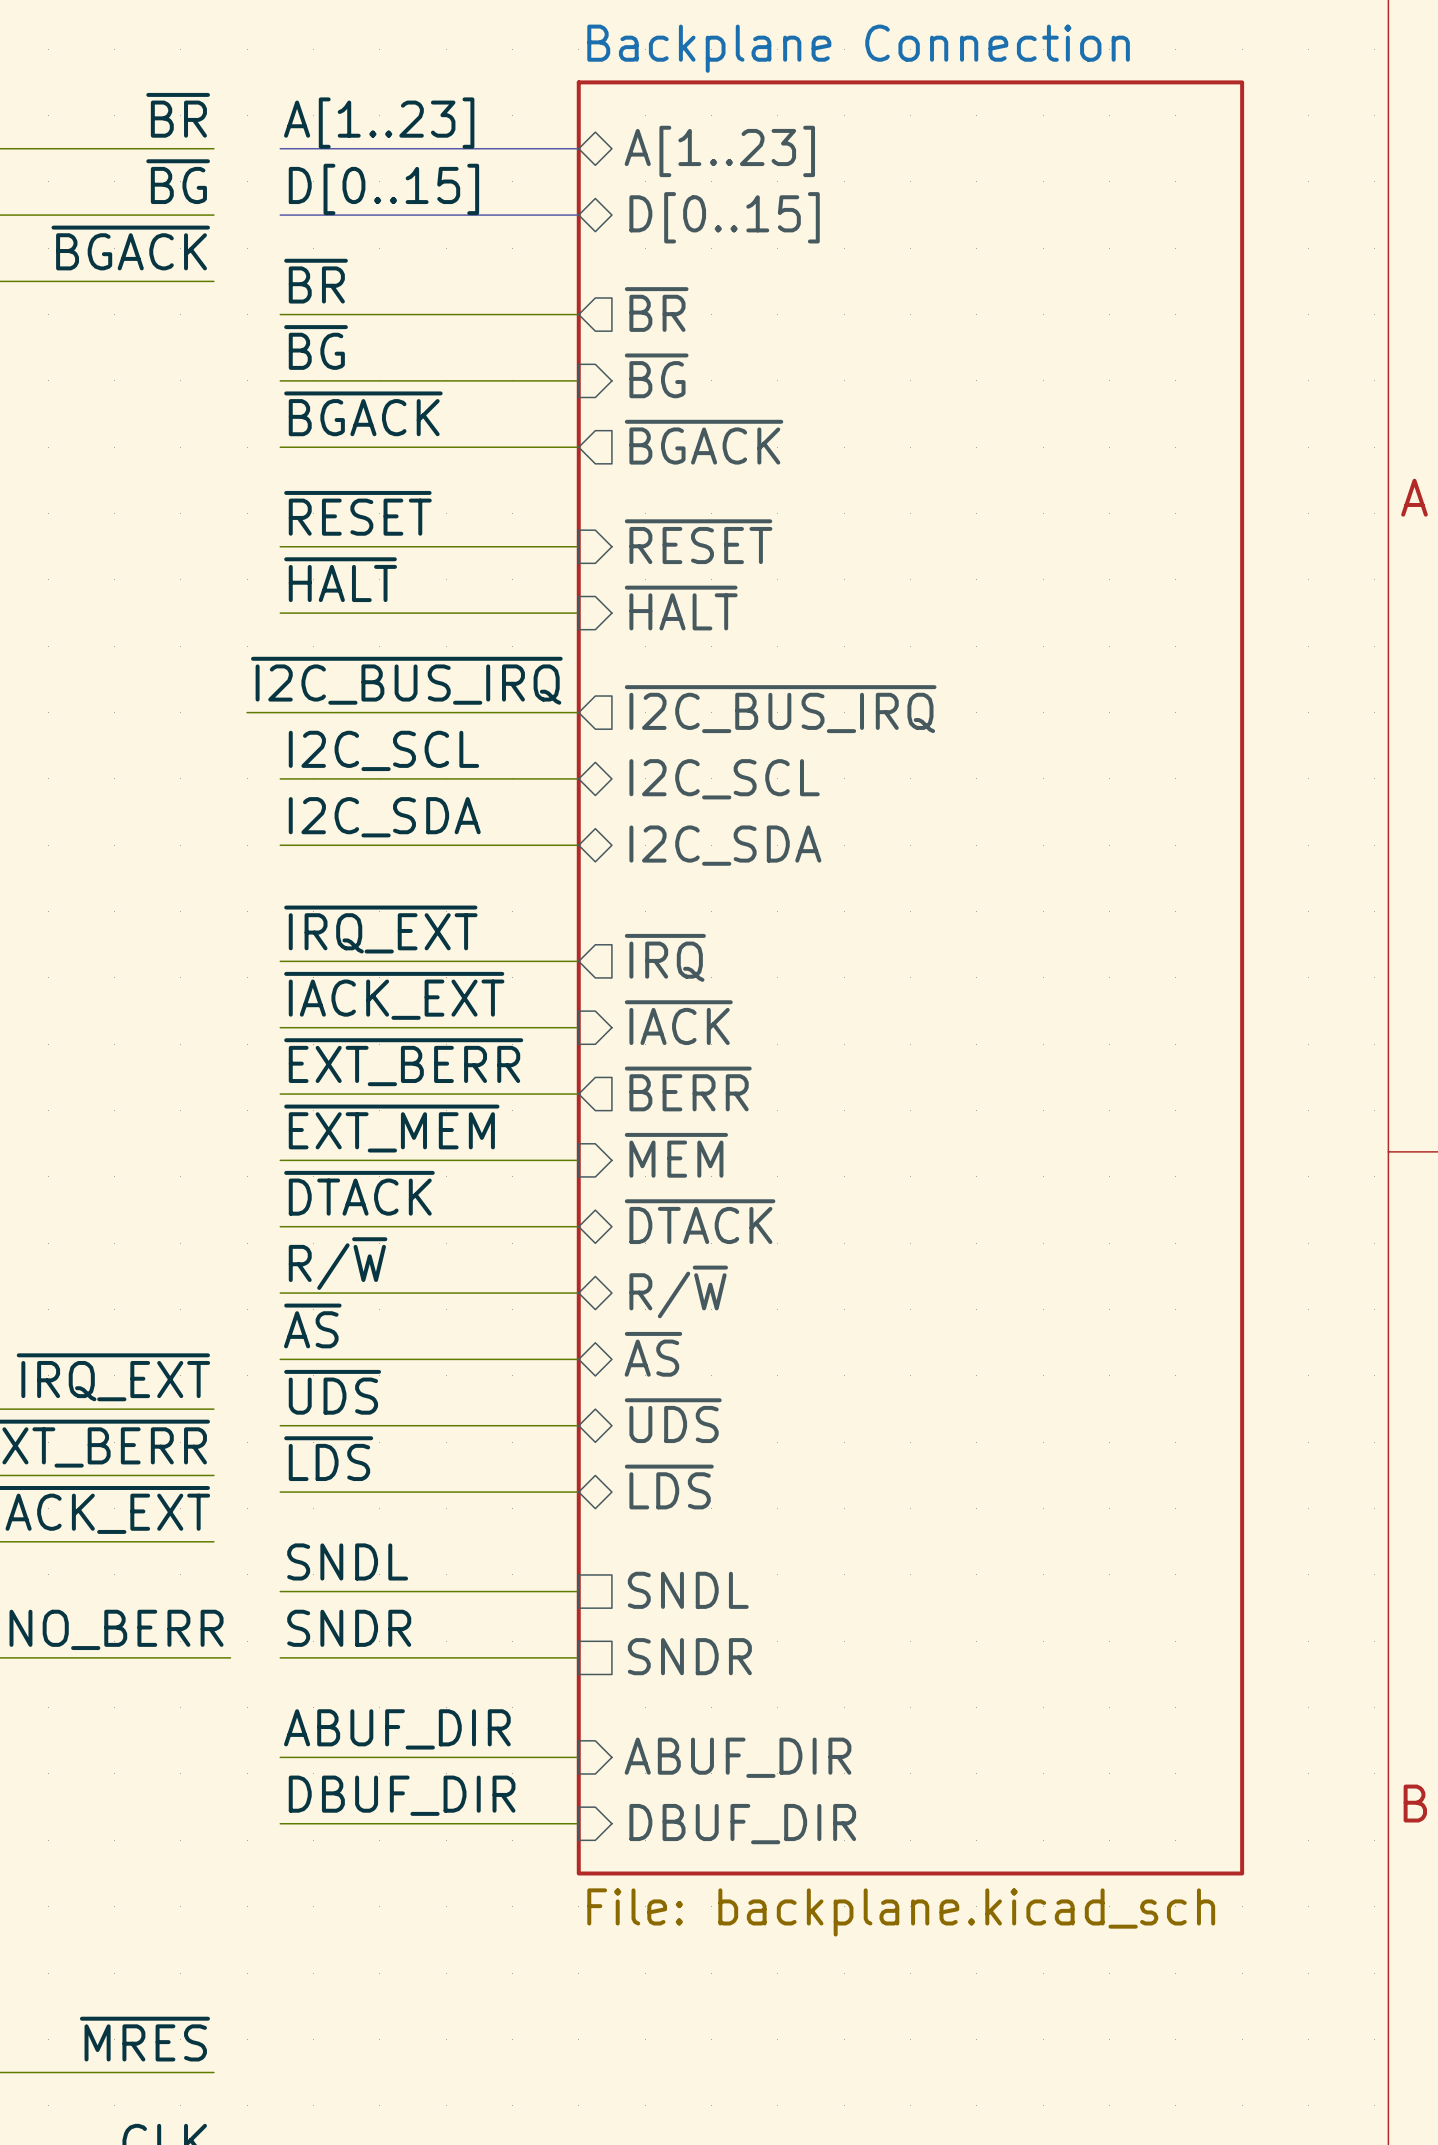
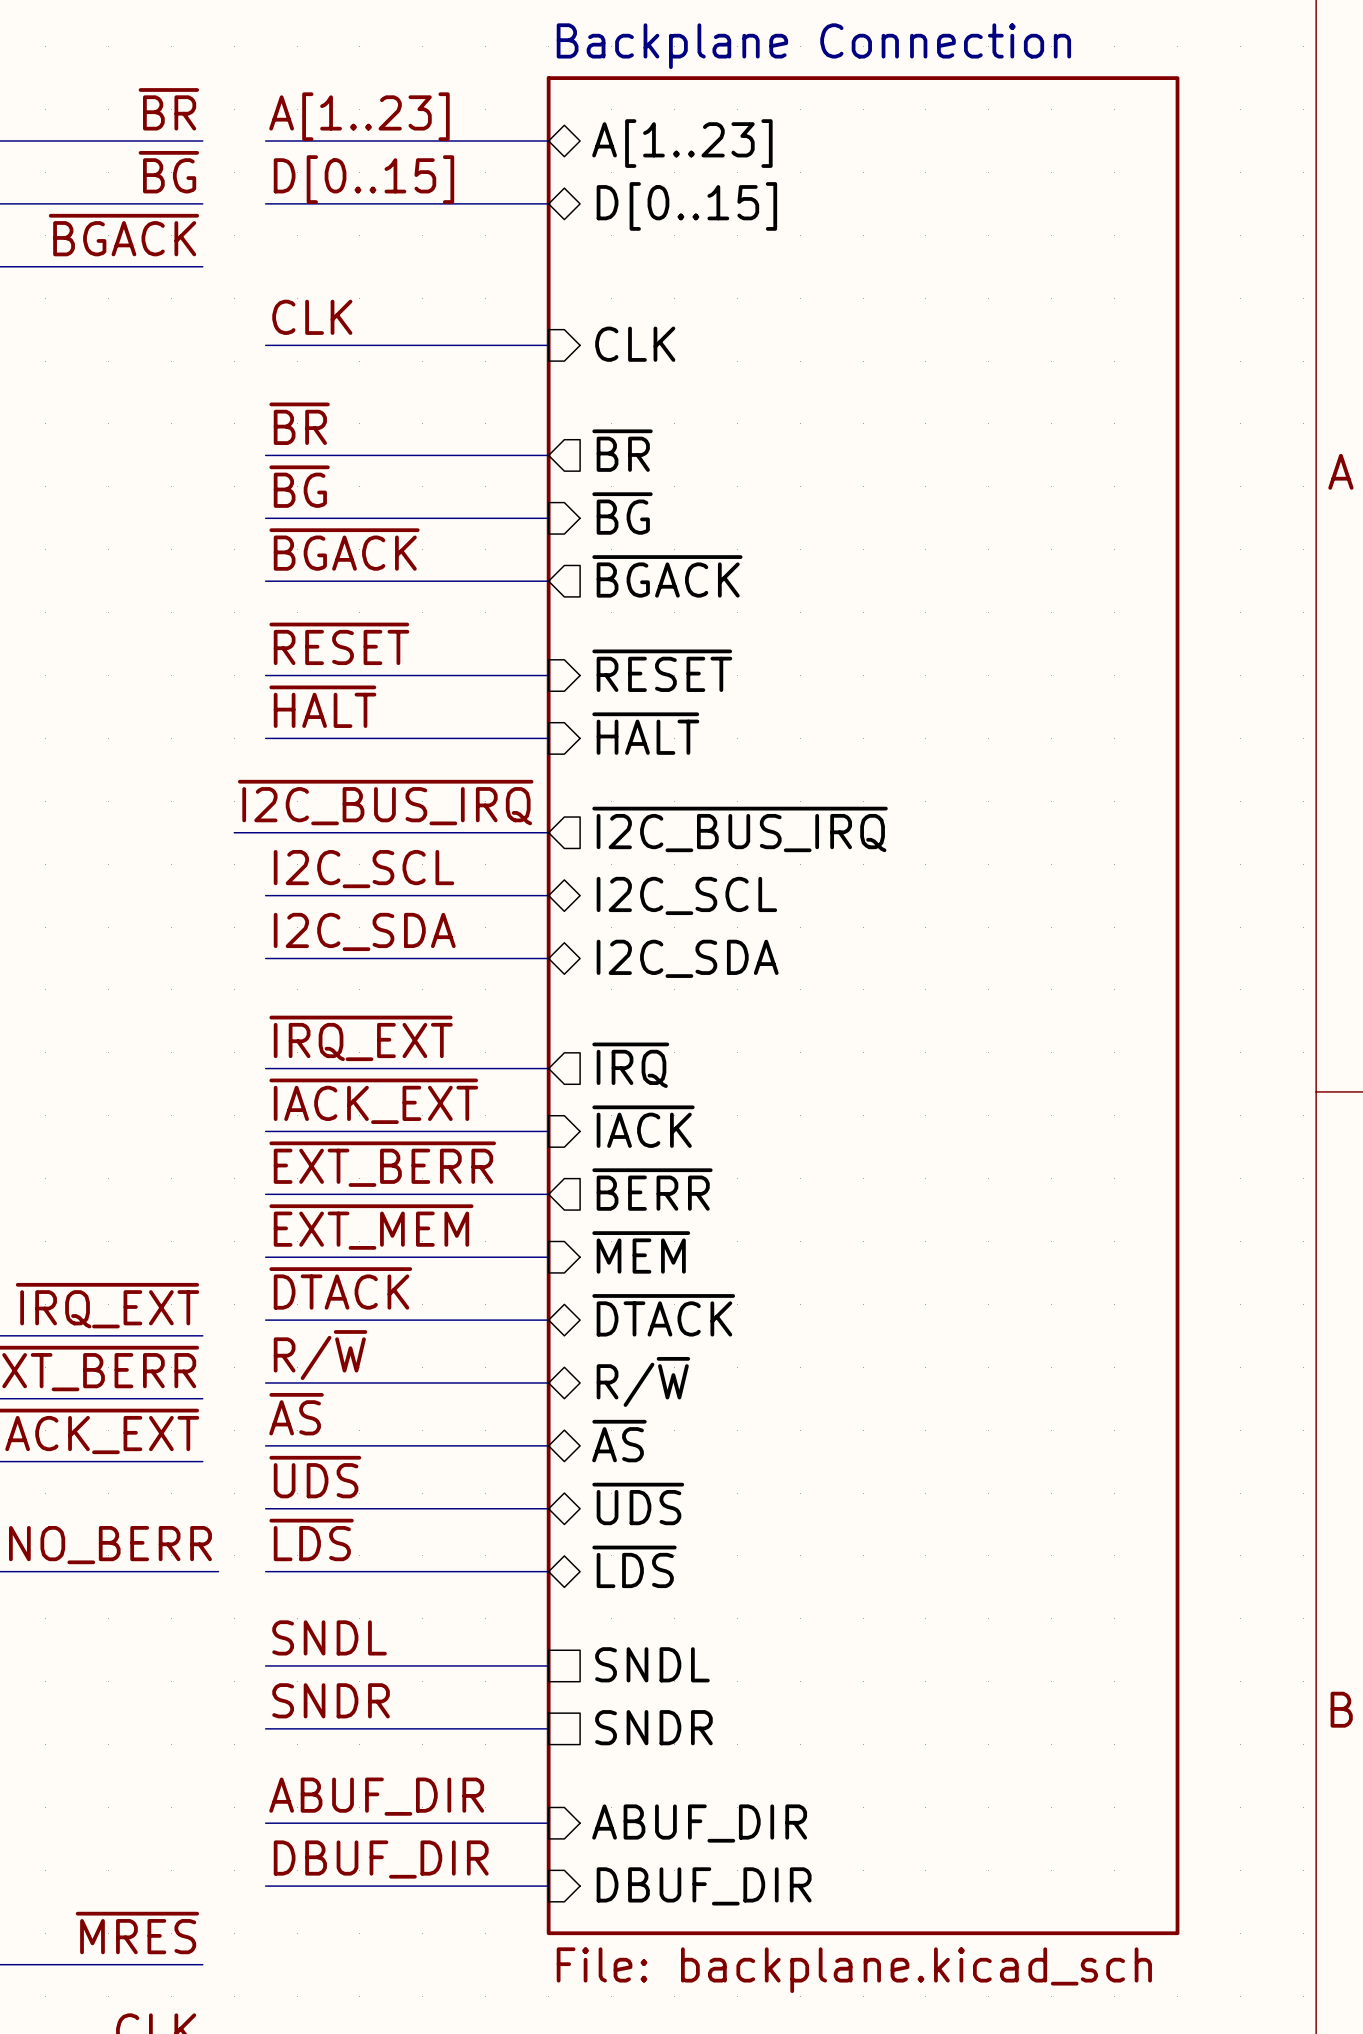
label position: ~{BR} (316, 281) -> ~{BR} (299, 423)
sheet pin position: ~{BR} (656, 309) -> ~{BR} (622, 450)
wire: (280, 314) (578, 314) -> (265, 345) (548, 345)
label: ~{BG} (316, 347) -> CLK (312, 317)
sheet pin: ~{BG} (656, 375) -> CLK (635, 344)
wire: (280, 380) (578, 380) -> (265, 455) (548, 455)
label: ~{BGACK} (363, 413) -> none
sheet pin: ~{BGACK} (704, 442) -> none
wire: (280, 447) (578, 447) -> (265, 958) (548, 958)
label: ~{RESET} (357, 513) -> ~{BG} (299, 486)
sheet pin: ~{RESET} (698, 541) -> ~{BG} (622, 513)
label: ~{HALT} (340, 579) -> ~{BGACK} (344, 549)
sheet pin shape: input (681, 608) -> output (667, 576)
sheet pin: ~{HALT} (681, 608) -> ~{BGACK} (667, 576)
label: none -> ~{RESET} (339, 643)
label position: ~{I2C_BUS_IRQ} (406, 680) -> ~{I2C_BUS_IRQ} (385, 802)
sheet pin shape: output (780, 709) -> input (662, 670)
sheet pin: ~{I2C_BUS_IRQ} (780, 709) -> ~{RESET} (662, 670)
wire: (247, 712) (280, 712) -> none
label: I2C_SCL (383, 750) -> ~{HALT} (322, 706)
sheet pin shape: bidirectional (724, 779) -> input (645, 733)
sheet pin: I2C_SCL (724, 779) -> ~{HALT} (645, 733)
label position: I2C_SDA (384, 817) -> I2C_SDA (364, 931)
wire: (280, 845) (578, 845) -> (265, 895) (548, 895)
sheet pin position: I2C_SDA (725, 845) -> I2C_SDA (687, 958)
sheet pin: none -> ~{I2C_BUS_IRQ} (740, 829)
wire: none -> (234, 832) (548, 832)
label: none -> I2C_SCL (363, 869)
label position: ~{IRQ_EXT} (380, 929) -> ~{IRQ_EXT} (361, 1038)
sheet pin: none -> I2C_SCL (686, 895)
sheet pin position: ~{IRQ} (665, 957) -> ~{IRQ} (630, 1065)
wire: (280, 961) (578, 961) -> none
sheet Backplane Connection: File: backplane.kicad_sch (910, 977) -> none
label position: ~{IACK_EXT} (394, 995) -> ~{IACK_EXT} (373, 1101)
sheet pin position: ~{IACK} (678, 1022) -> ~{IACK} (643, 1126)
wire: (280, 1027) (578, 1027) -> (265, 1068) (548, 1068)
sheet Backplane Connection: none -> File: backplane.kicad_sch (863, 1005)
label position: ~{EXT_BERR} (403, 1062) -> ~{EXT_BERR} (382, 1164)
sheet pin position: ~{BERR} (688, 1088) -> ~{BERR} (652, 1189)
wire: (280, 1094) (578, 1094) -> (265, 1131) (548, 1131)
label position: ~{EXT_MEM} (391, 1128) -> ~{EXT_MEM} (371, 1227)
sheet pin position: ~{MEM} (676, 1155) -> ~{MEM} (641, 1252)
wire: (280, 1160) (578, 1160) -> (265, 1194) (548, 1194)
label position: ~{DTACK} (359, 1193) -> ~{DTACK} (340, 1288)
sheet pin position: ~{DTACK} (700, 1221) -> ~{DTACK} (663, 1315)
wire: (280, 1226) (578, 1226) -> (265, 1257) (548, 1257)
label position: R/~{W} (338, 1263) -> R/~{W} (320, 1355)
sheet pin position: R/~{W} (678, 1291) -> R/~{W} (643, 1381)
wire: (280, 1293) (578, 1293) -> (265, 1320) (548, 1320)
label position: ~{AS} (312, 1325) -> ~{AS} (296, 1414)
sheet pin position: ~{AS} (653, 1354) -> ~{AS} (619, 1441)
wire: (280, 1359) (578, 1359) -> (265, 1382) (548, 1382)
label: ~{UDS} (332, 1392) -> none
sheet pin: ~{UDS} (673, 1420) -> none
wire: (280, 1425) (578, 1425) -> (265, 1445) (548, 1445)
label: ~{LDS} (328, 1458) -> none
sheet pin: ~{LDS} (669, 1487) -> none
wire: (280, 1492) (578, 1492) -> (265, 1886) (548, 1886)
label: SNDL (347, 1561) -> ~{UDS} (315, 1477)
sheet pin shape: passive (688, 1590) -> bidirectional (638, 1503)
sheet pin: SNDL (688, 1590) -> ~{UDS} (638, 1503)
label: SNDR (349, 1628) -> ~{LDS} (311, 1539)
sheet pin shape: passive (689, 1656) -> bidirectional (634, 1566)
sheet pin: SNDR (689, 1656) -> ~{LDS} (634, 1566)
label: ABUF_DIR (397, 1729) -> SNDL (329, 1637)
sheet pin shape: input (738, 1757) -> passive (652, 1664)
sheet pin: ABUF_DIR (738, 1757) -> SNDL (652, 1664)
label: DBUF_DIR (402, 1795) -> SNDR (331, 1700)
sheet pin shape: input (742, 1824) -> passive (653, 1727)
sheet pin: DBUF_DIR (742, 1824) -> SNDR (653, 1727)
label: none -> ABUF_DIR (376, 1796)
wire: none -> (265, 1823) (548, 1823)
sheet pin: none -> ABUF_DIR (699, 1823)
label: none -> DBUF_DIR (381, 1859)
sheet pin: none -> DBUF_DIR (704, 1886)

